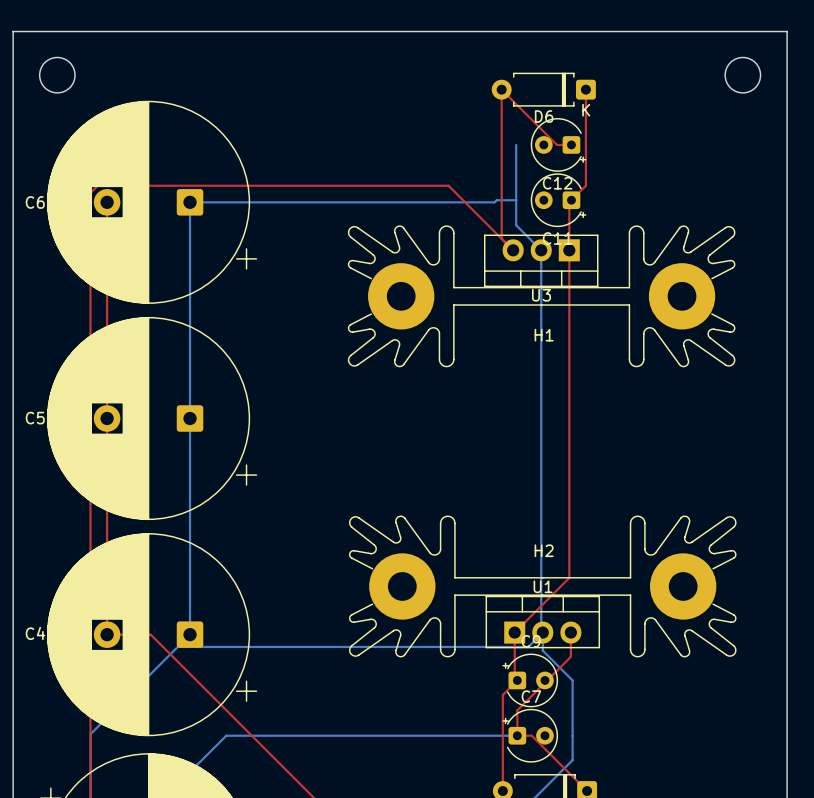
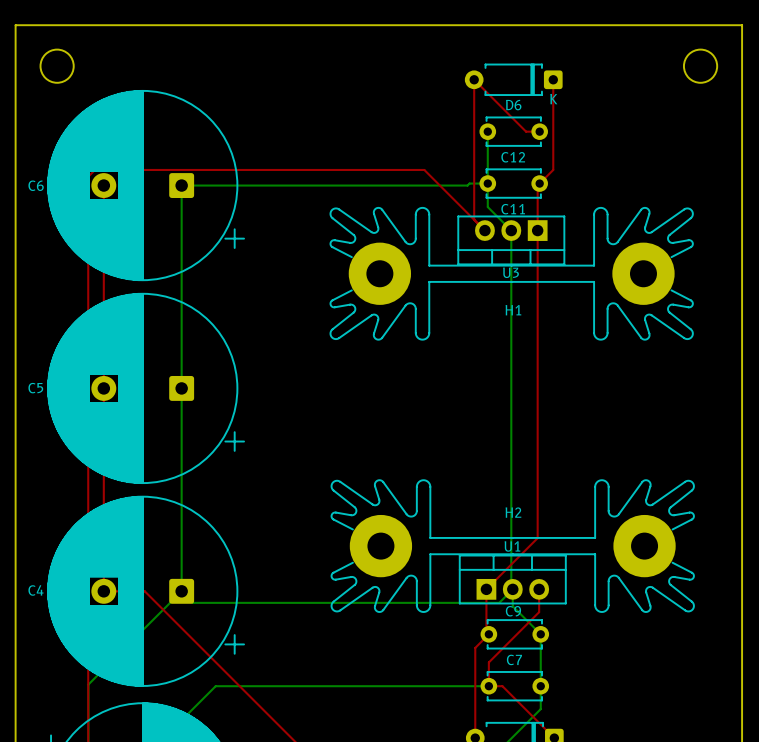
C12 footprint: [530, 118, 587, 172] -> [479, 116, 548, 147]
C11 footprint: [530, 173, 587, 228] -> [479, 168, 548, 199]
C9 footprint: [502, 653, 559, 708] -> [480, 619, 550, 650]
C7 footprint: [502, 708, 559, 763] -> [480, 671, 550, 702]

